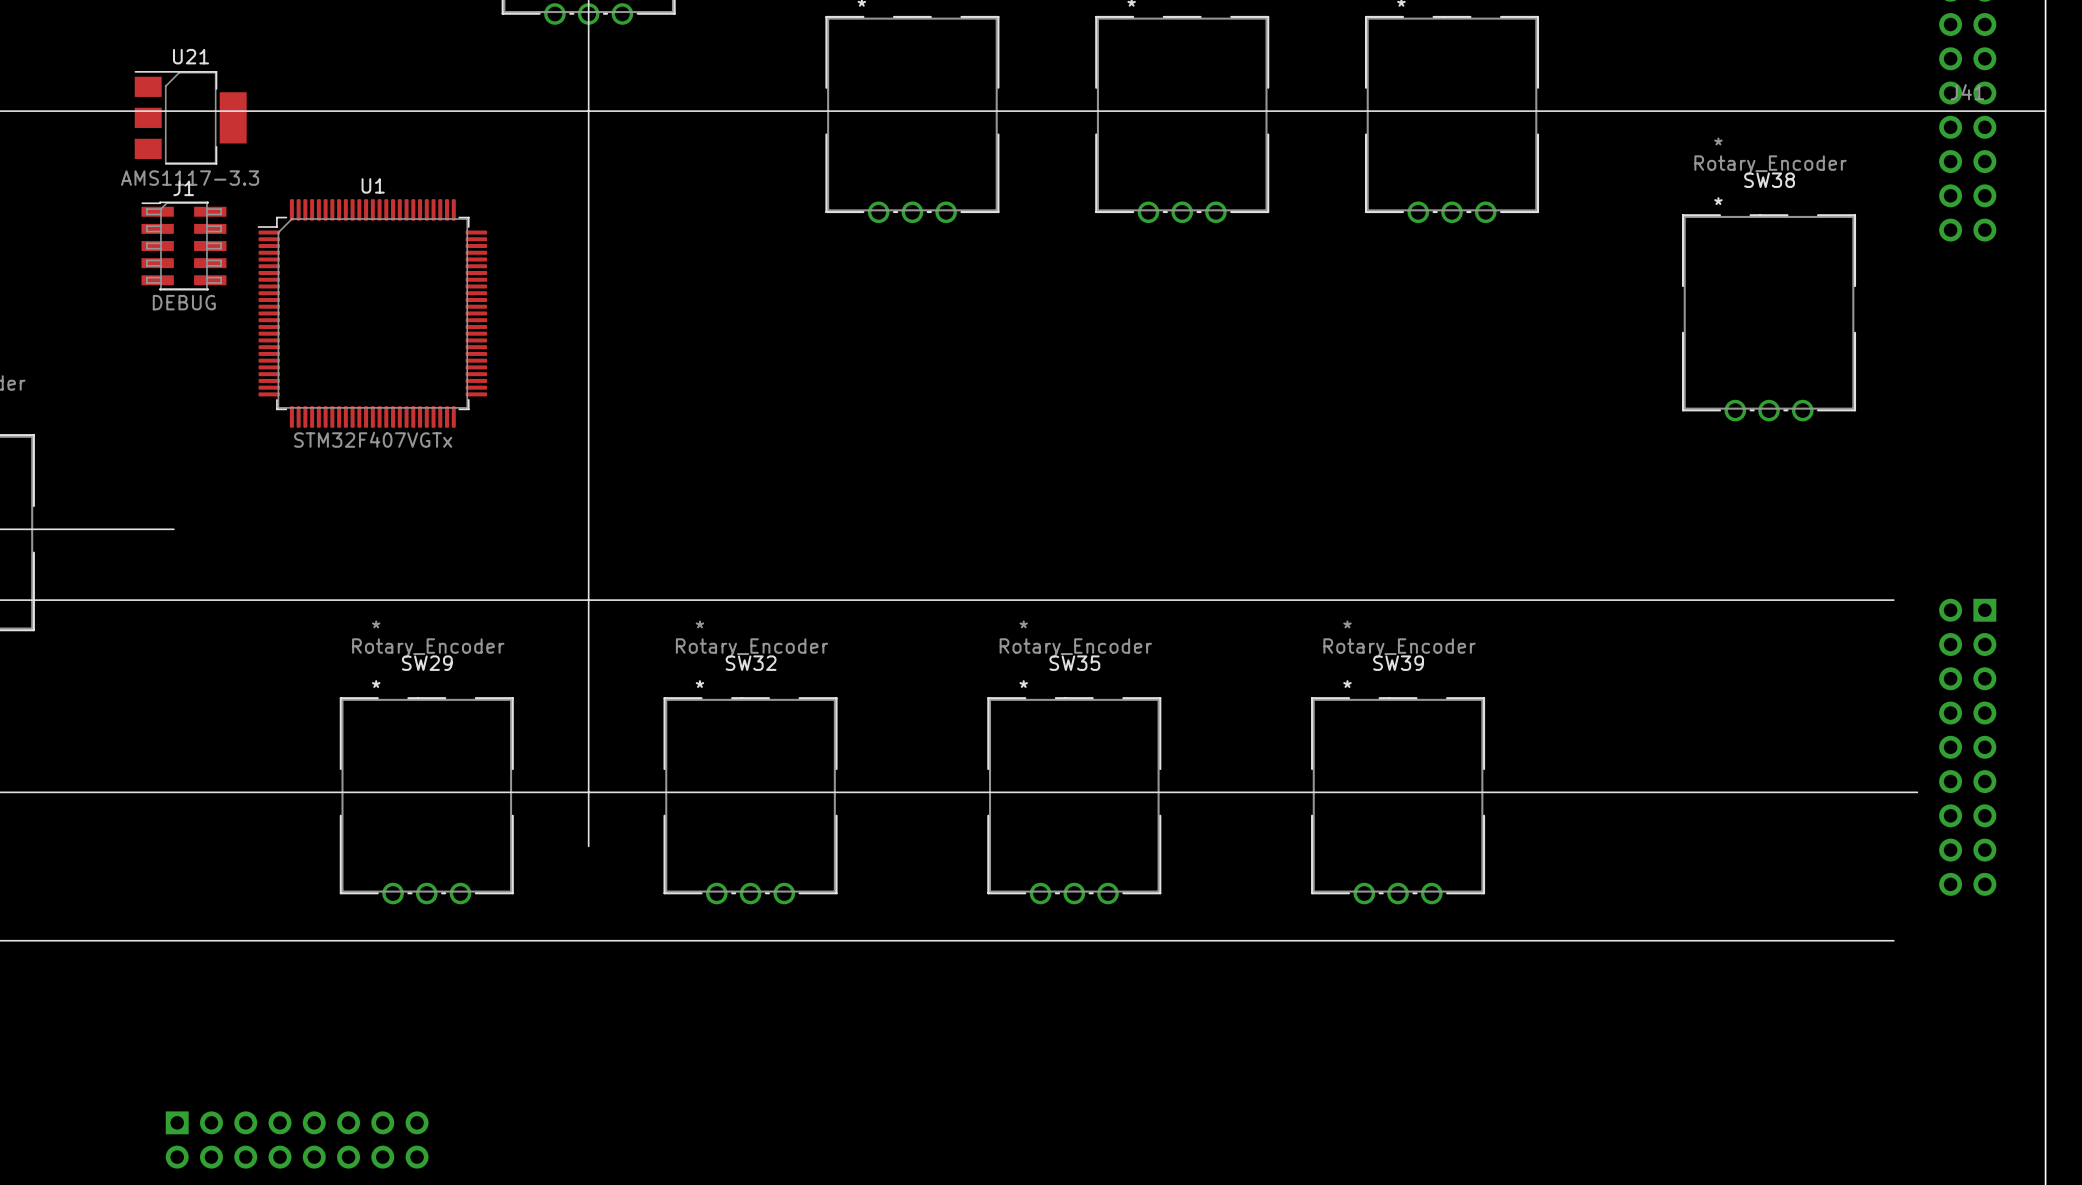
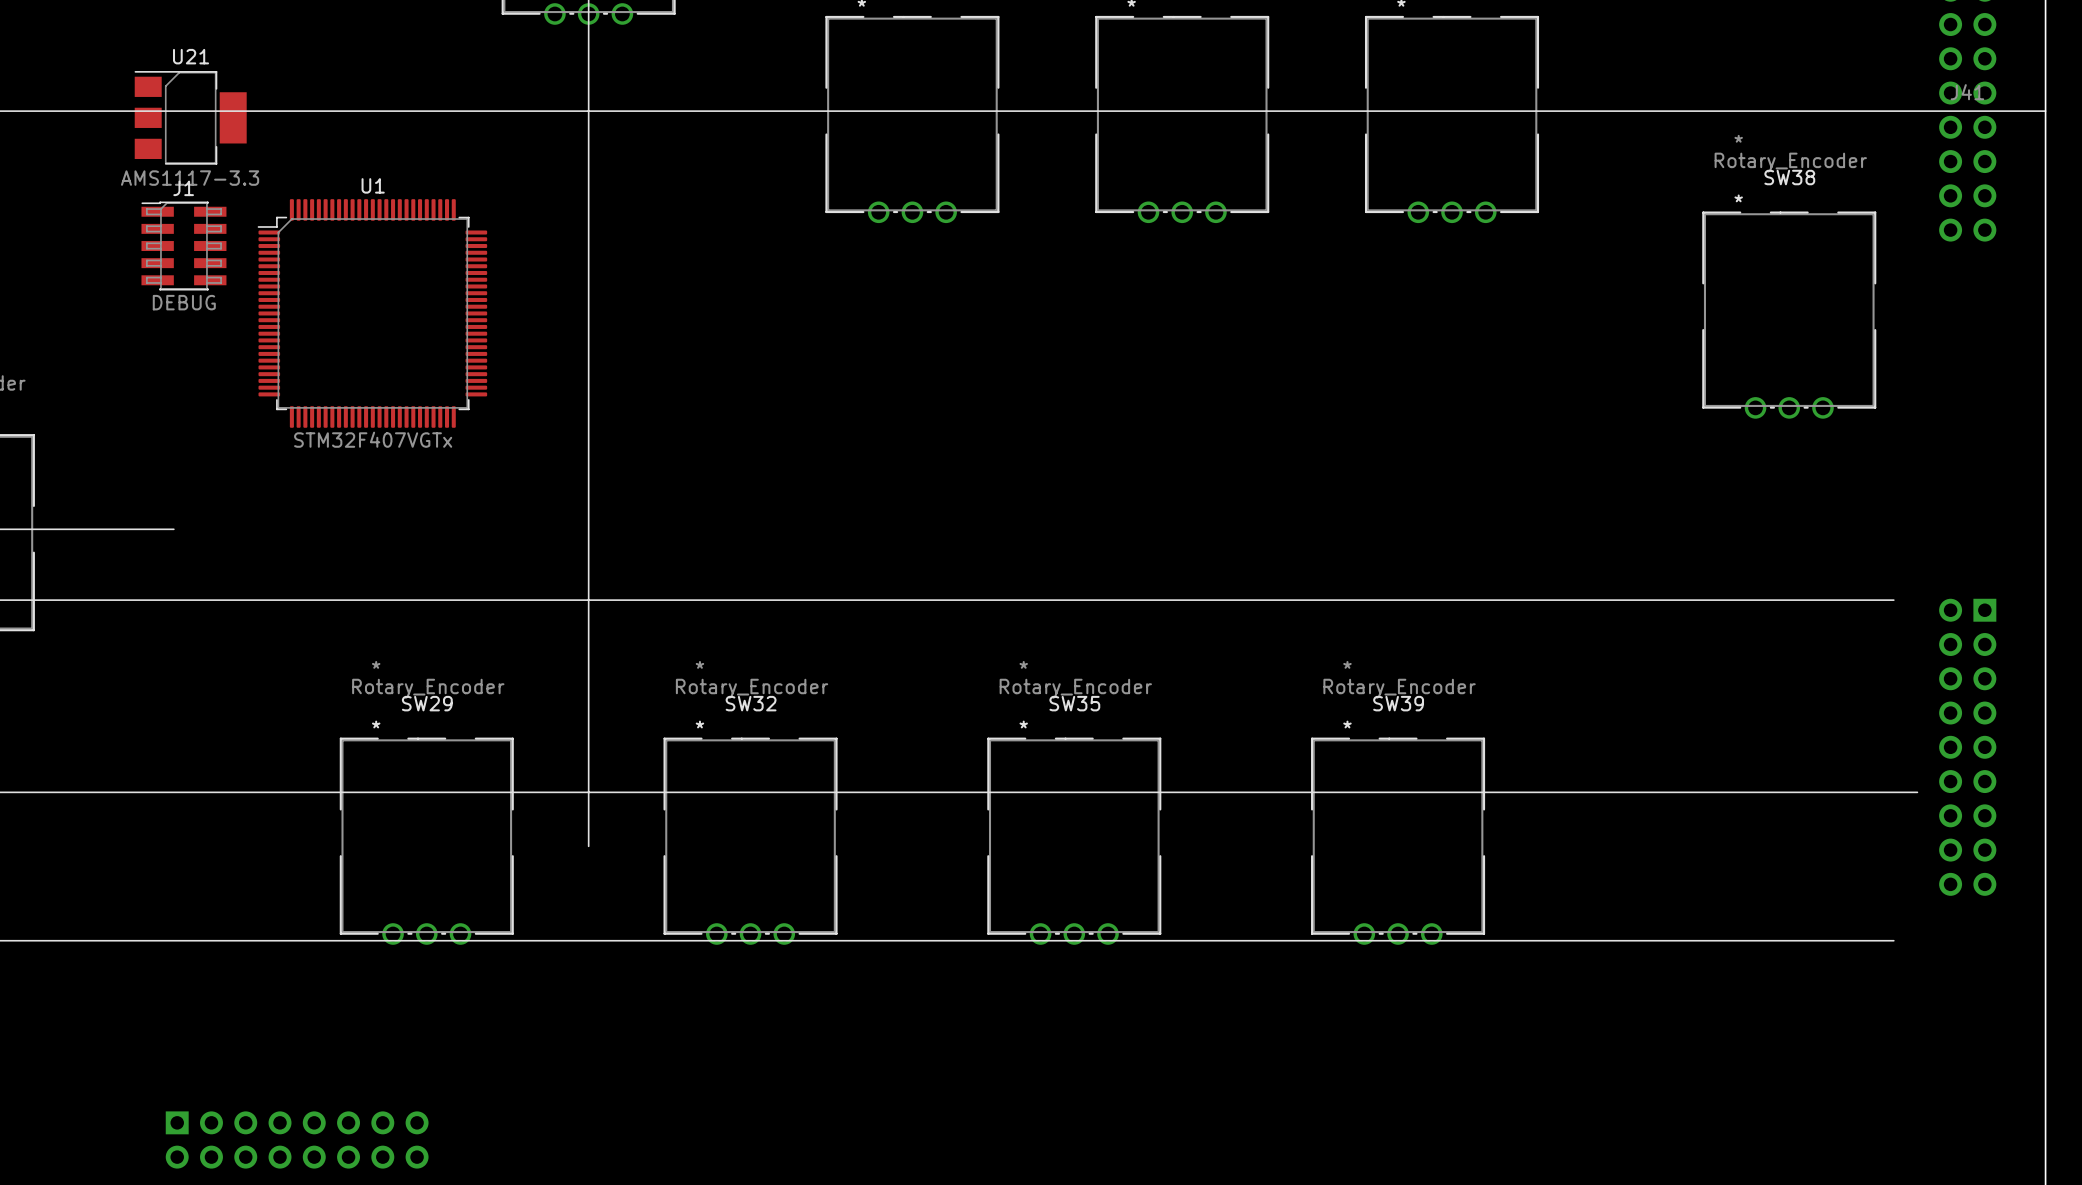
SW38 position: (1769, 317) -> (1789, 315)
SW29 position: (426, 800) -> (426, 841)
SW32 position: (750, 800) -> (750, 841)
SW35 position: (1074, 800) -> (1074, 841)
SW39 position: (1398, 800) -> (1398, 841)

